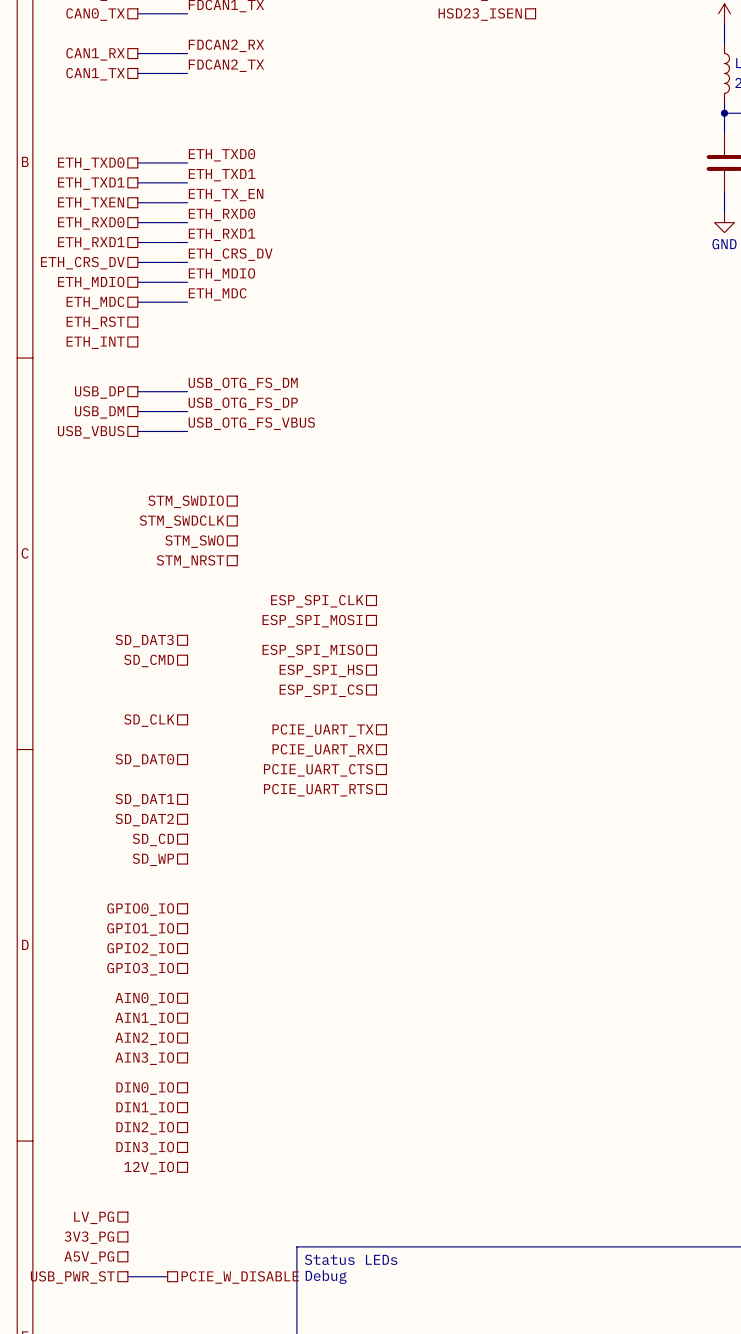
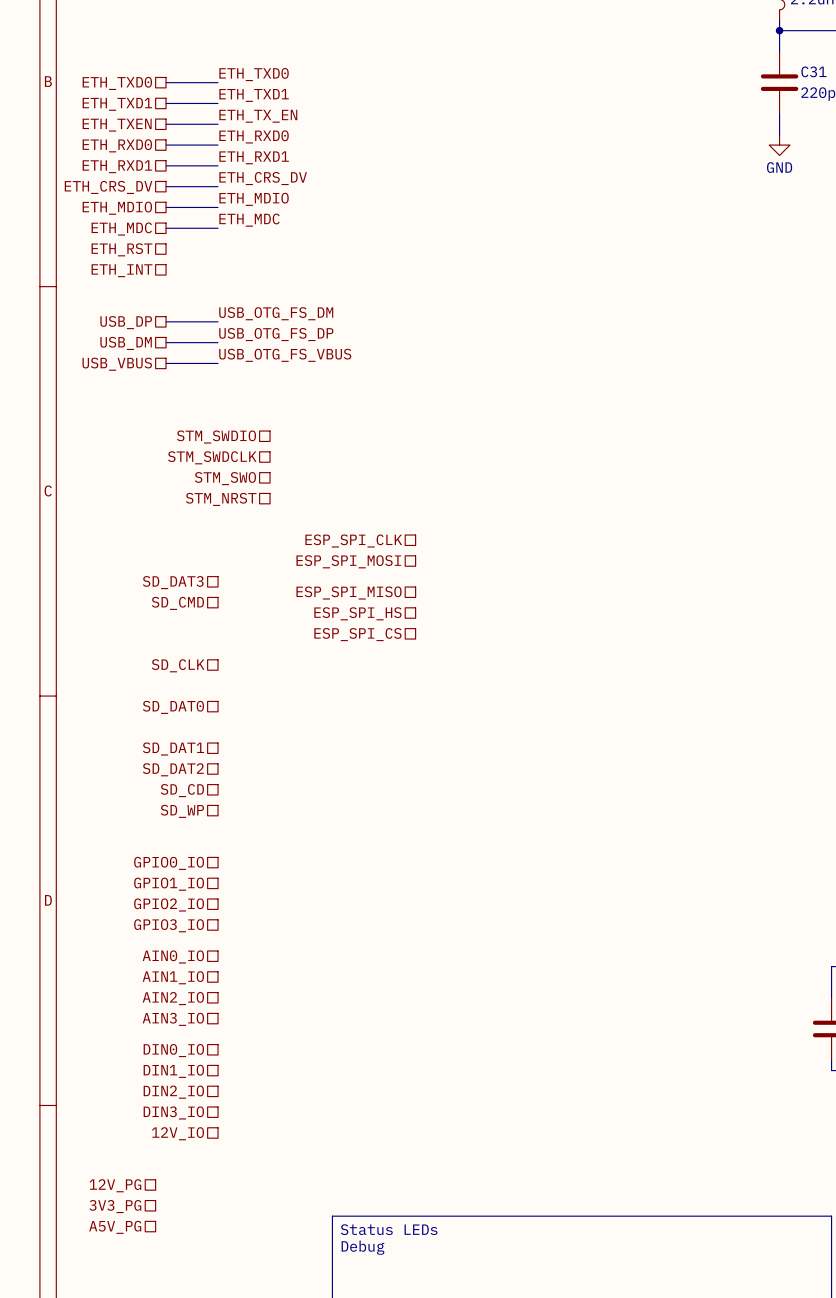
hierarchical label: PCIE_UART_TX (322, 730) -> none
hierarchical label: PCIE_UART_RX (322, 750) -> none
hierarchical label: PCIE_UART_CTS (318, 770) -> none
hierarchical label: PCIE_UART_RTS (318, 790) -> none
hierarchical label: LV_PG (94, 1217) -> 12V_PG (115, 1185)
wire: (127, 1276) (167, 1276) -> none
hierarchical label: USB_PWR_ST (72, 1277) -> none
hierarchical label: PCIE_W_DISABLE (240, 1277) -> none

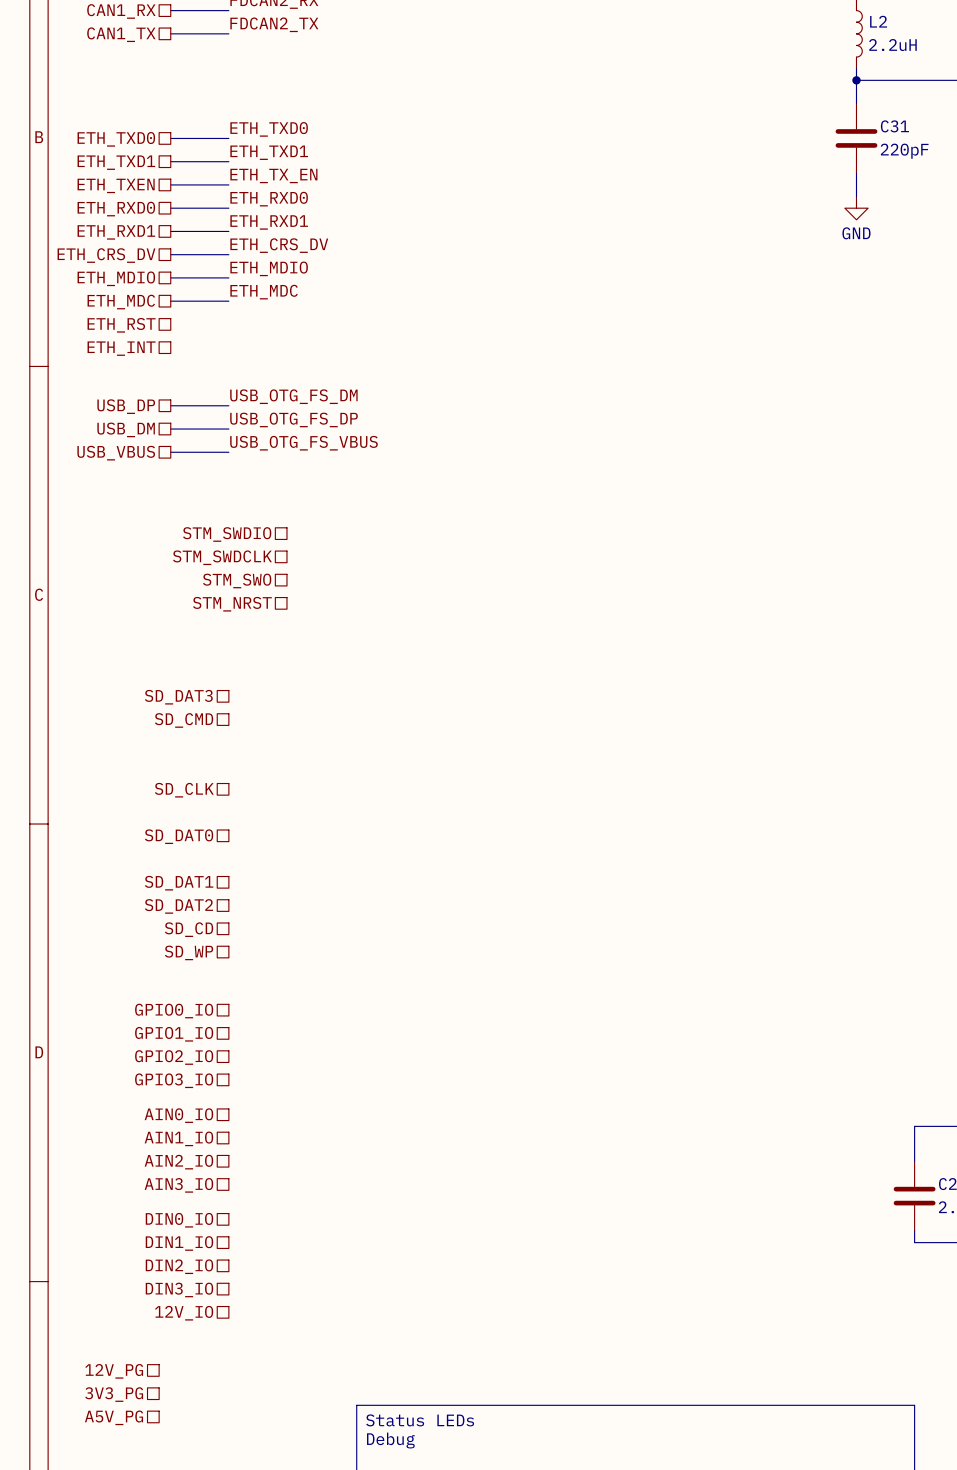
hierarchical label: ESP_SPI_CLK (353, 541) -> none
hierarchical label: ESP_SPI_MOSI (348, 561) -> none
hierarchical label: ESP_SPI_MISO (349, 593) -> none
hierarchical label: ESP_SPI_HS (357, 613) -> none
hierarchical label: ESP_SPI_CS (357, 634) -> none

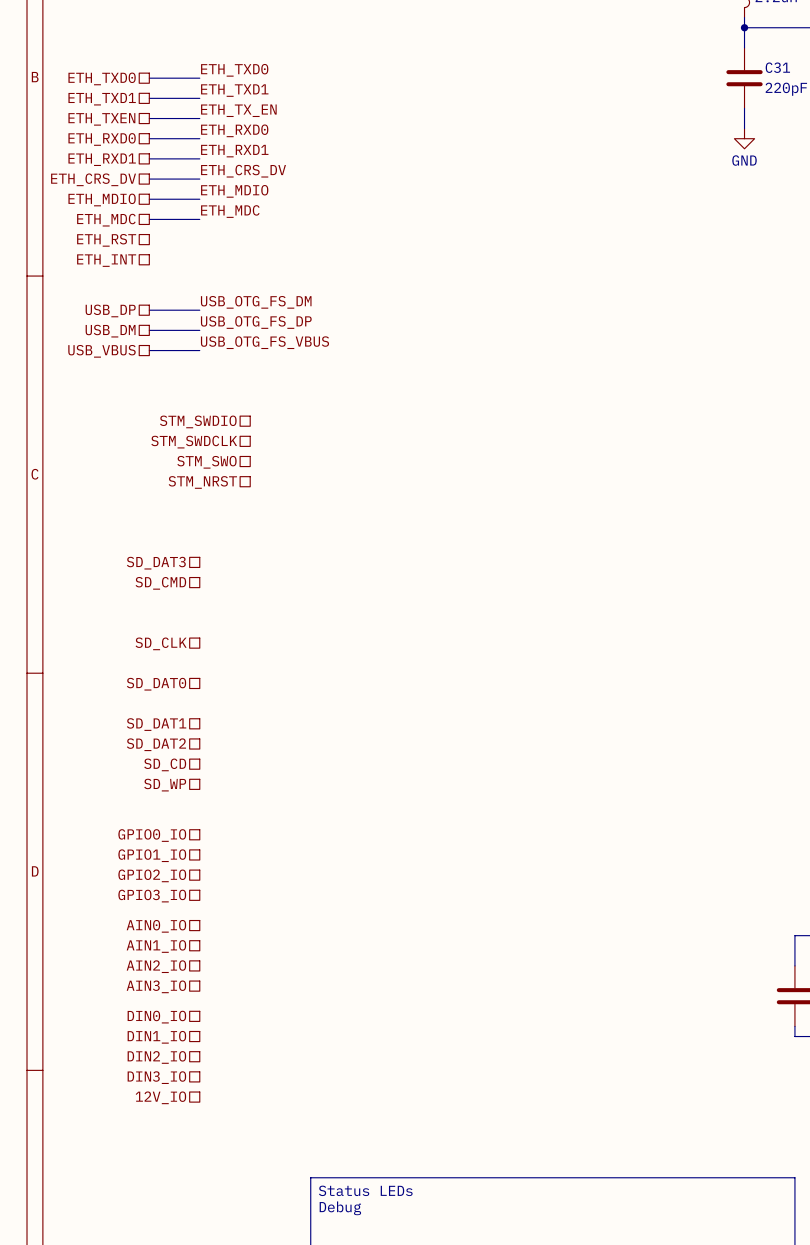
hierarchical label: 12V_PG (114, 1371) -> none
hierarchical label: 3V3_PG (114, 1394) -> none
hierarchical label: A5V_PG (114, 1417) -> none

